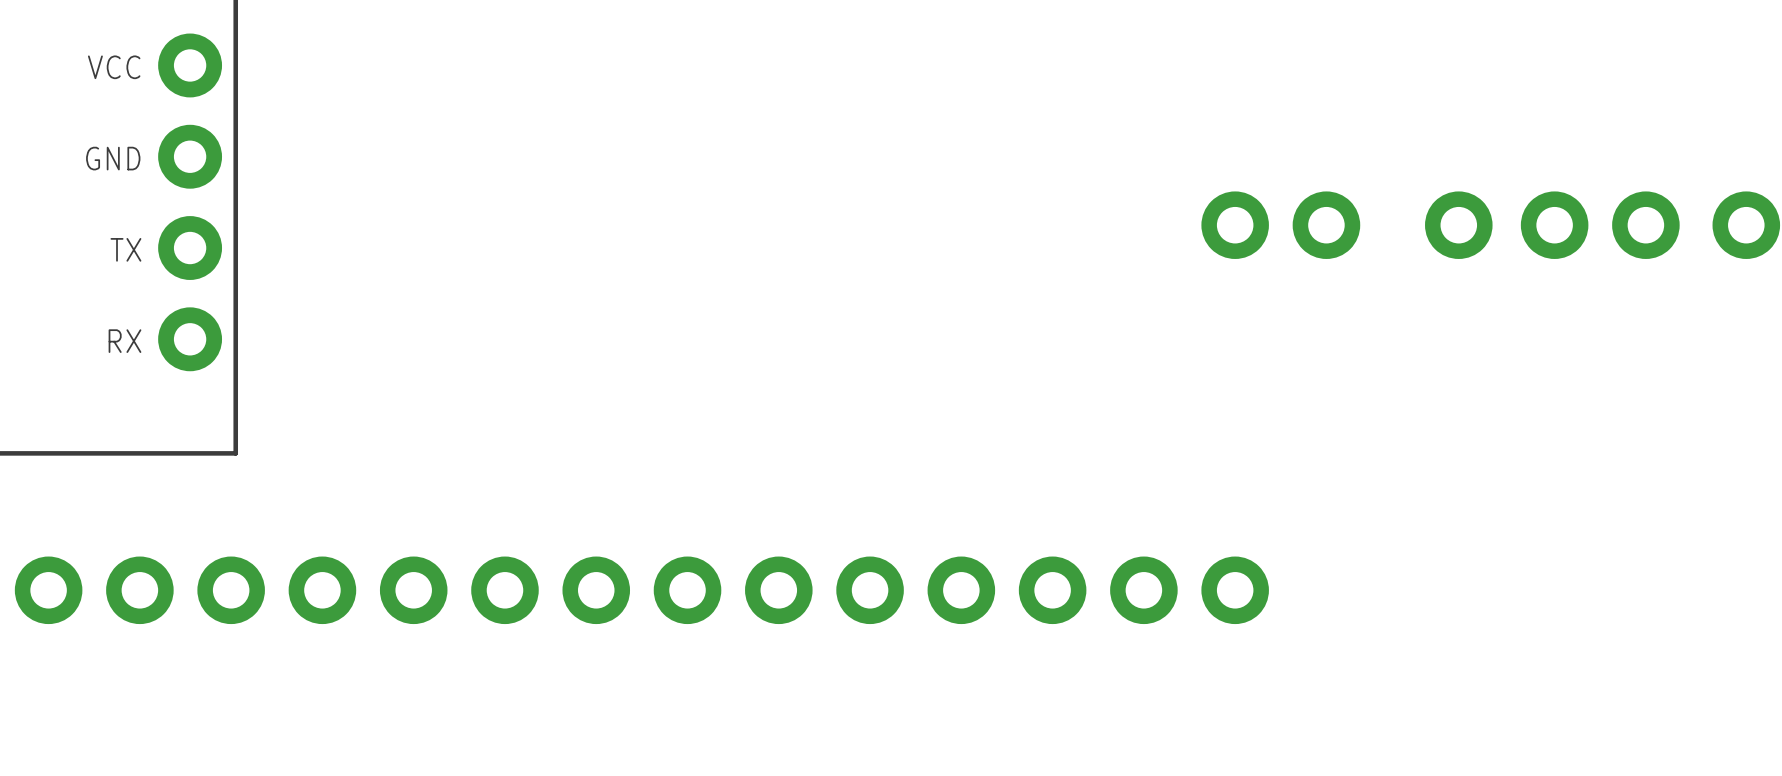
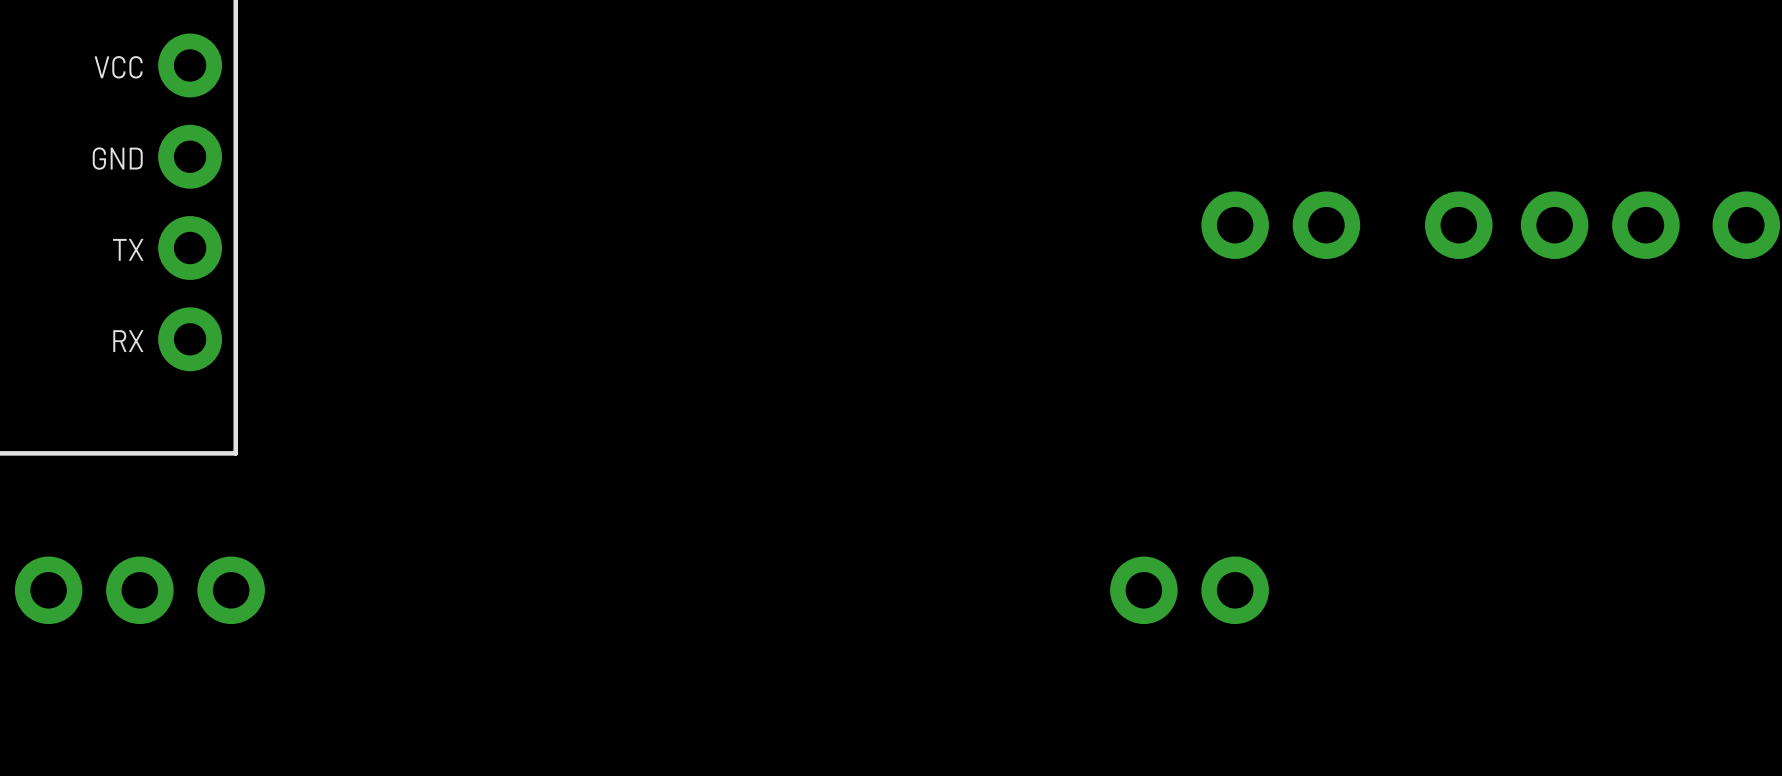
part: (687, 590) -> none

